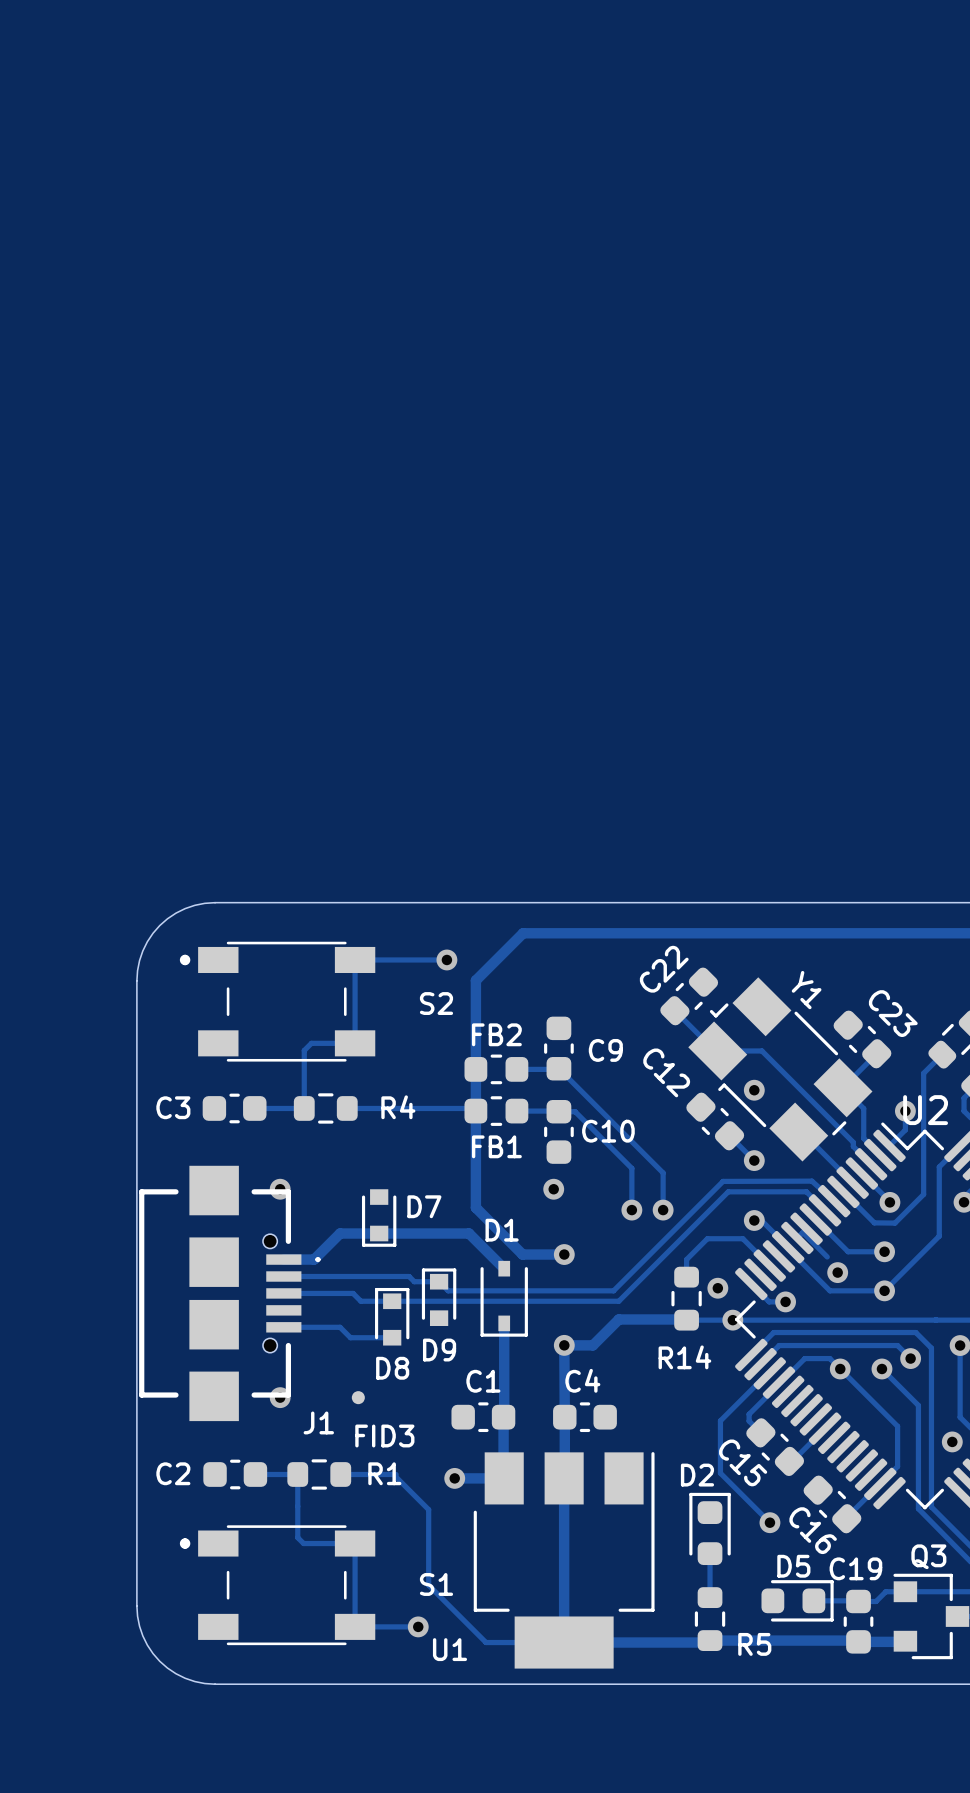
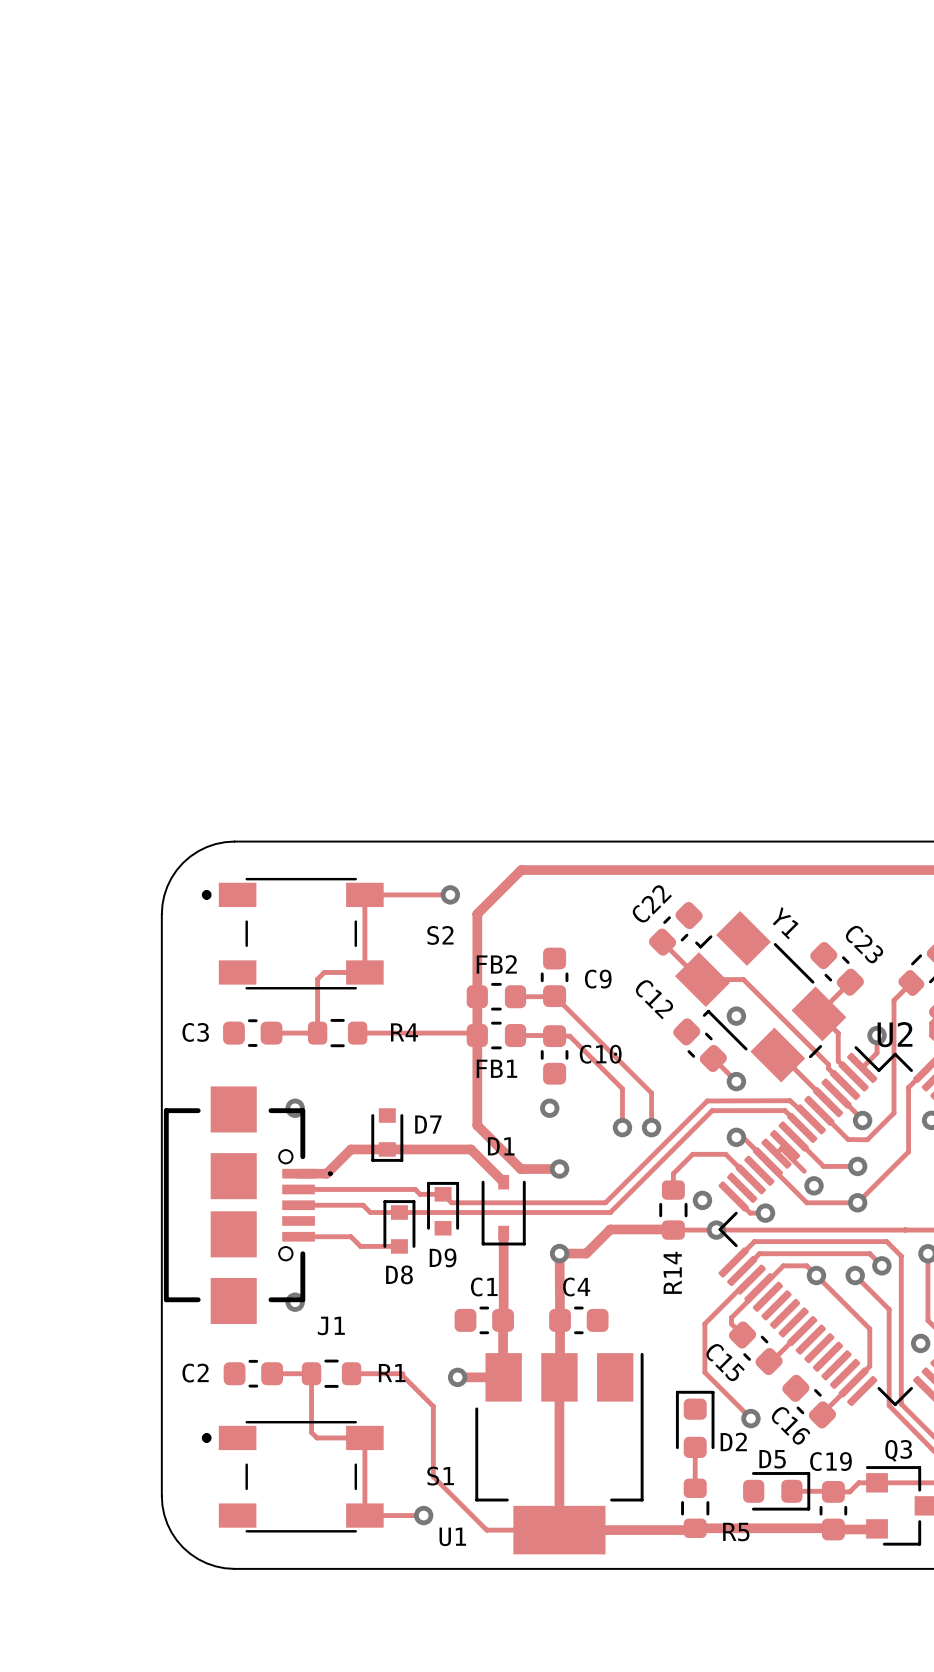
R14 name rotation: 0° (684, 1357) -> 90° counterclockwise (672, 1272)
FID3: (358, 1397) -> none
D2 name position: D2 (697, 1475) -> D2 (733, 1441)

